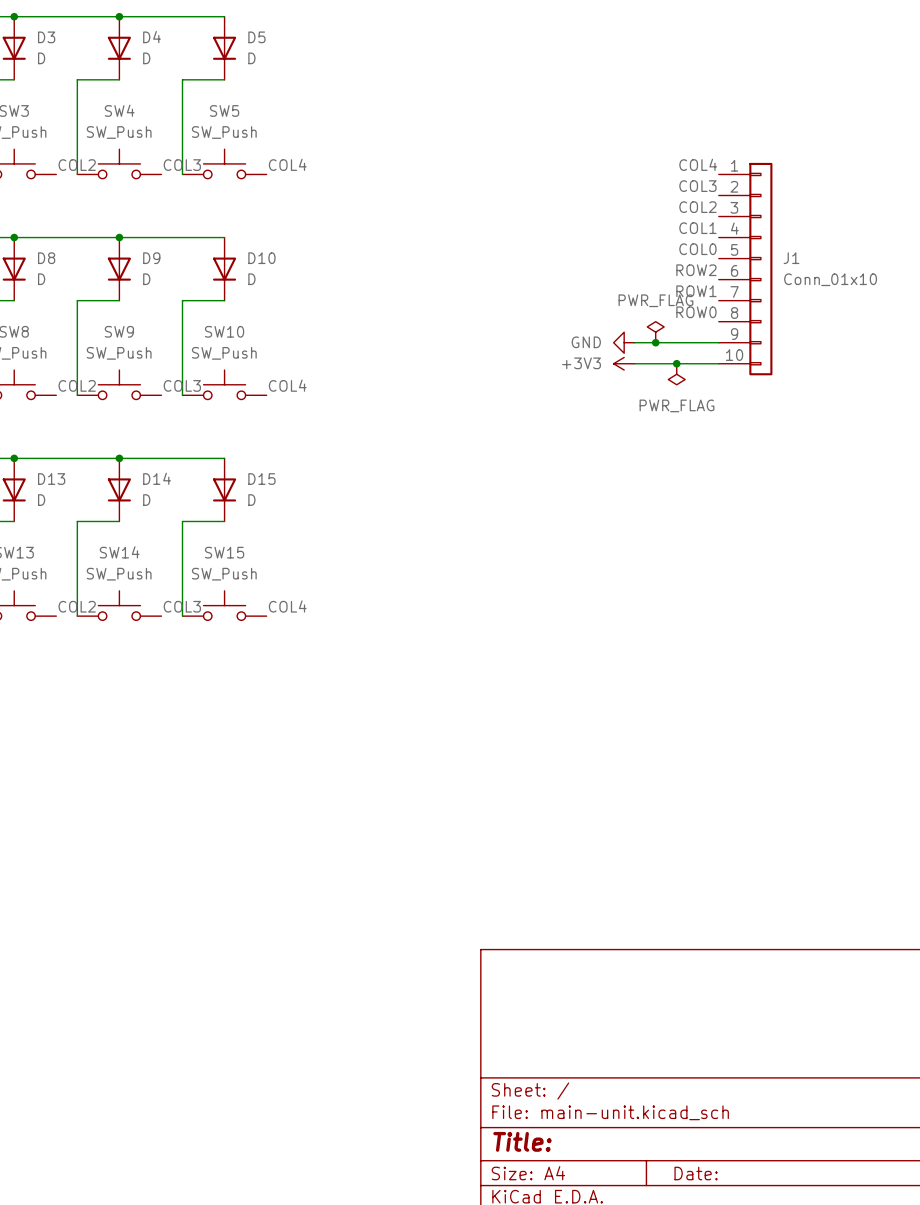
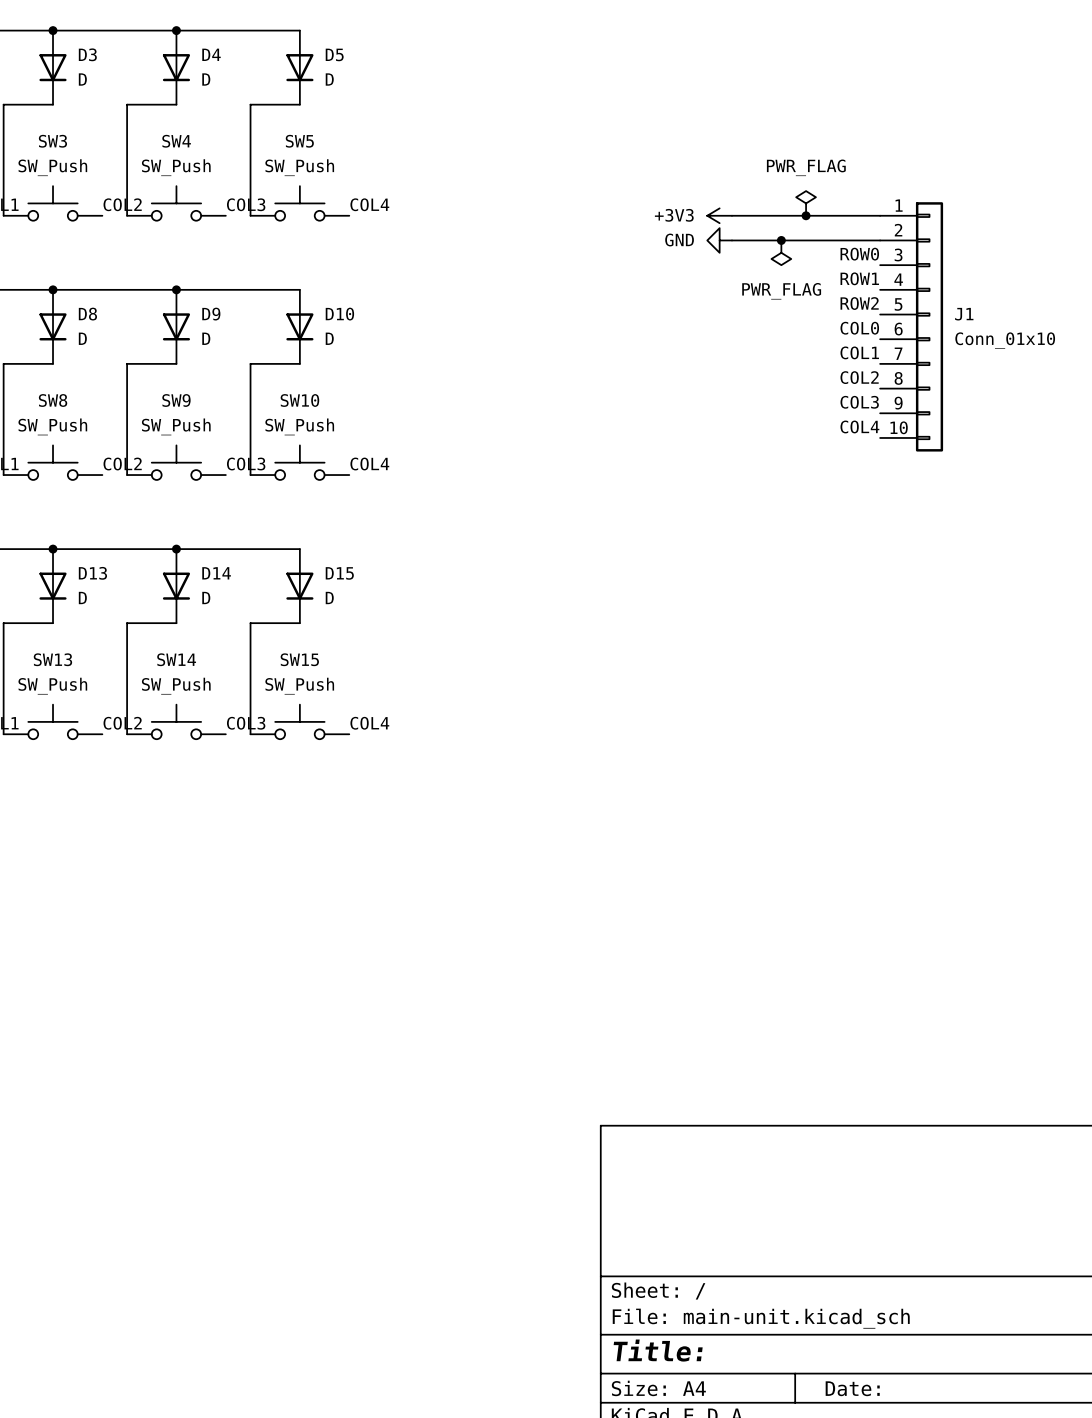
power symbol: none -> PWR_FLAG (806, 203)
label position: COL4 (698, 164) -> COL4 (859, 426)
wire: none -> (731, 215) (880, 215)
junction: none -> (806, 215)
label position: COL3 (697, 186) -> COL3 (859, 402)
wire: none -> (731, 240) (880, 240)
junction: none -> (781, 240)
power symbol: none -> PWR_FLAG (781, 252)
label: COL2 (697, 207) -> ROW0 (859, 254)
label: COL1 (697, 228) -> ROW1 (859, 278)
label: COL0 (697, 249) -> ROW2 (859, 303)
label: ROW2 (696, 270) -> COL0 (859, 328)
label: ROW1 (696, 291) -> COL1 (859, 352)
label: ROW0 (696, 312) -> COL2 (859, 377)
power symbol: PWR_FLAG (655, 332) -> none
power symbol position: GND (624, 342) -> GND (719, 240)
wire: (634, 342) (718, 342) -> none
junction: (655, 342) -> none
power symbol position: +3V3 (624, 363) -> +3V3 (719, 215)
wire: (634, 363) (718, 363) -> none
junction: (676, 363) -> none
power symbol: PWR_FLAG (676, 374) -> none

